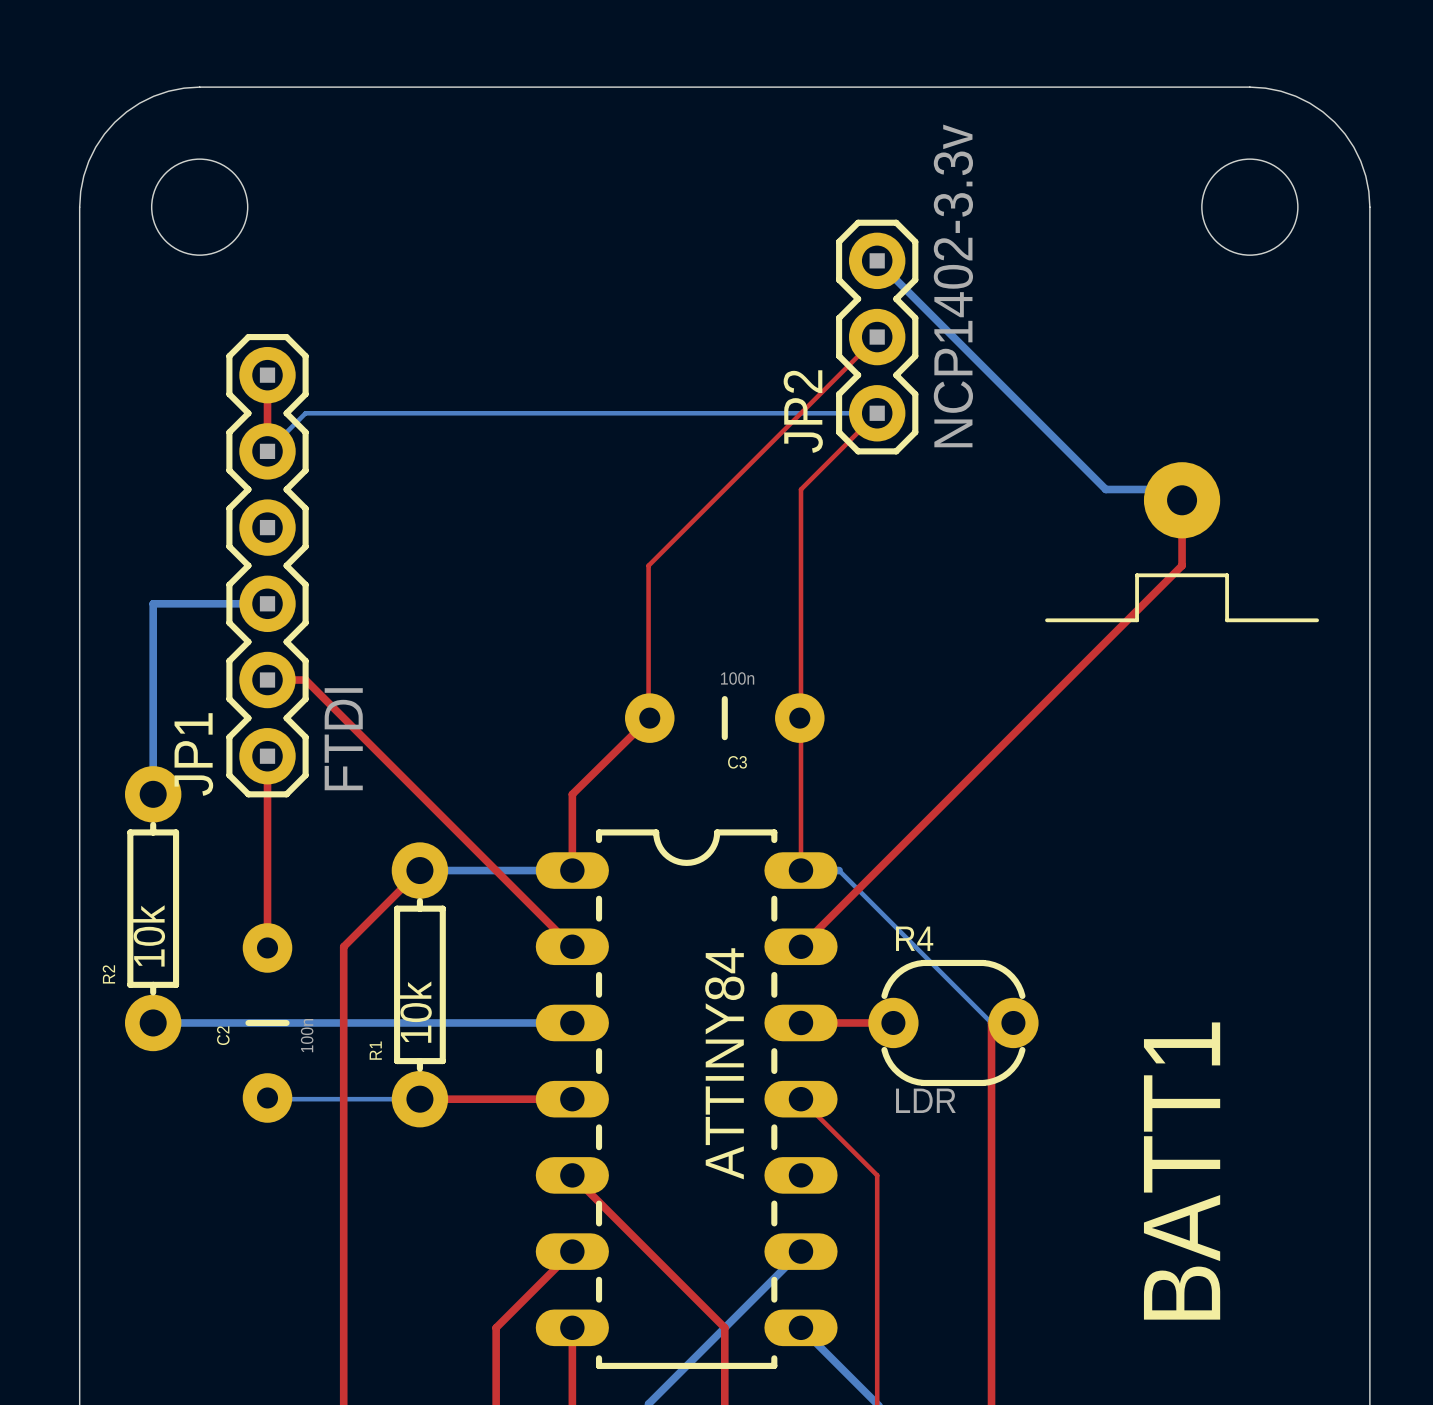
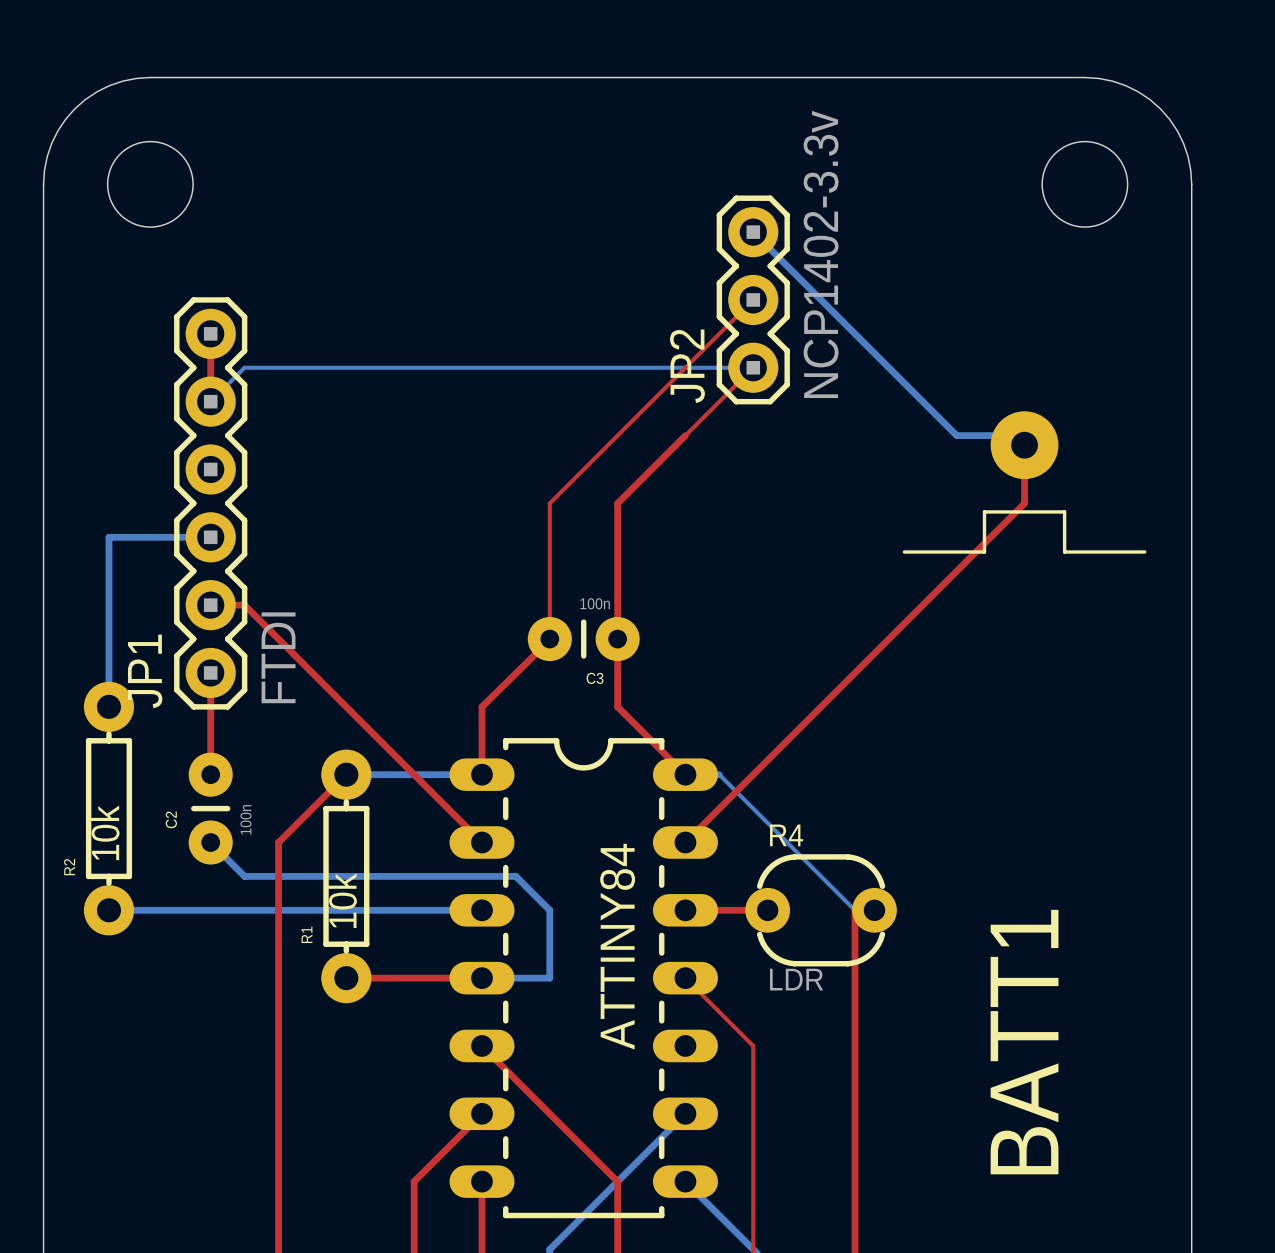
top track: (800, 489) (800, 870) -> (685, 435) (617, 503) (617, 706) (685, 774)
C3 footprint: [625, 693, 825, 743] -> [527, 617, 640, 662]
top track: (267, 870) (267, 947) -> none
C2 footprint: [242, 923, 293, 1123] -> [188, 752, 233, 865]
bottom track: none -> (210, 842) (244, 876) (515, 876) (549, 910) (549, 978) (481, 978)
bottom track: (267, 1097) (419, 1099) -> none

